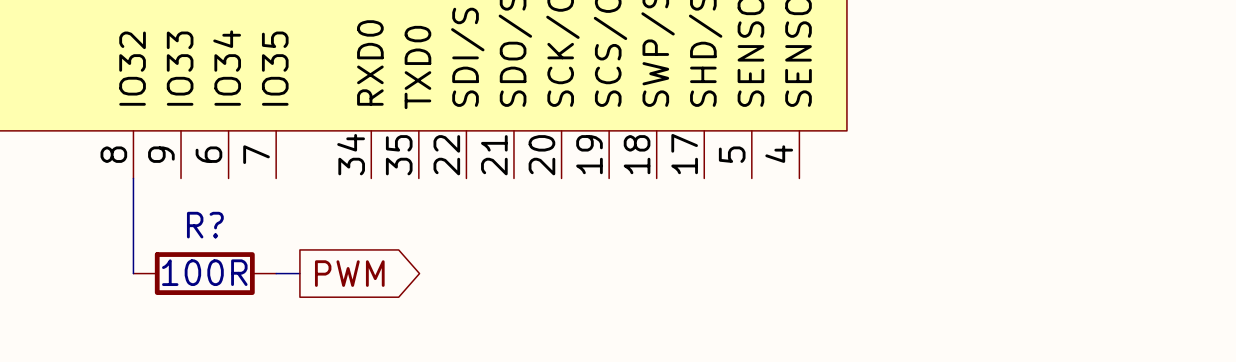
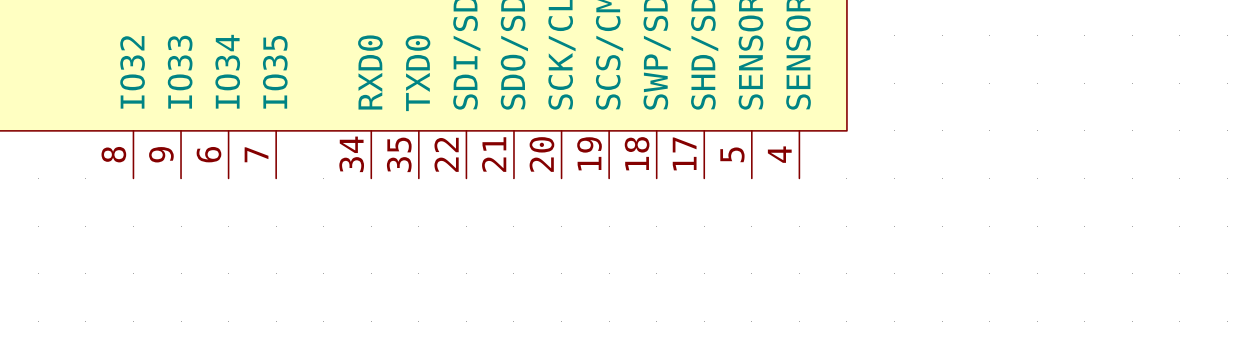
wire: (133, 178) (133, 273) -> none
R?: 100R (204, 273) -> none
wire: (276, 273) (299, 273) -> none
global label: PWM (349, 273) -> none

